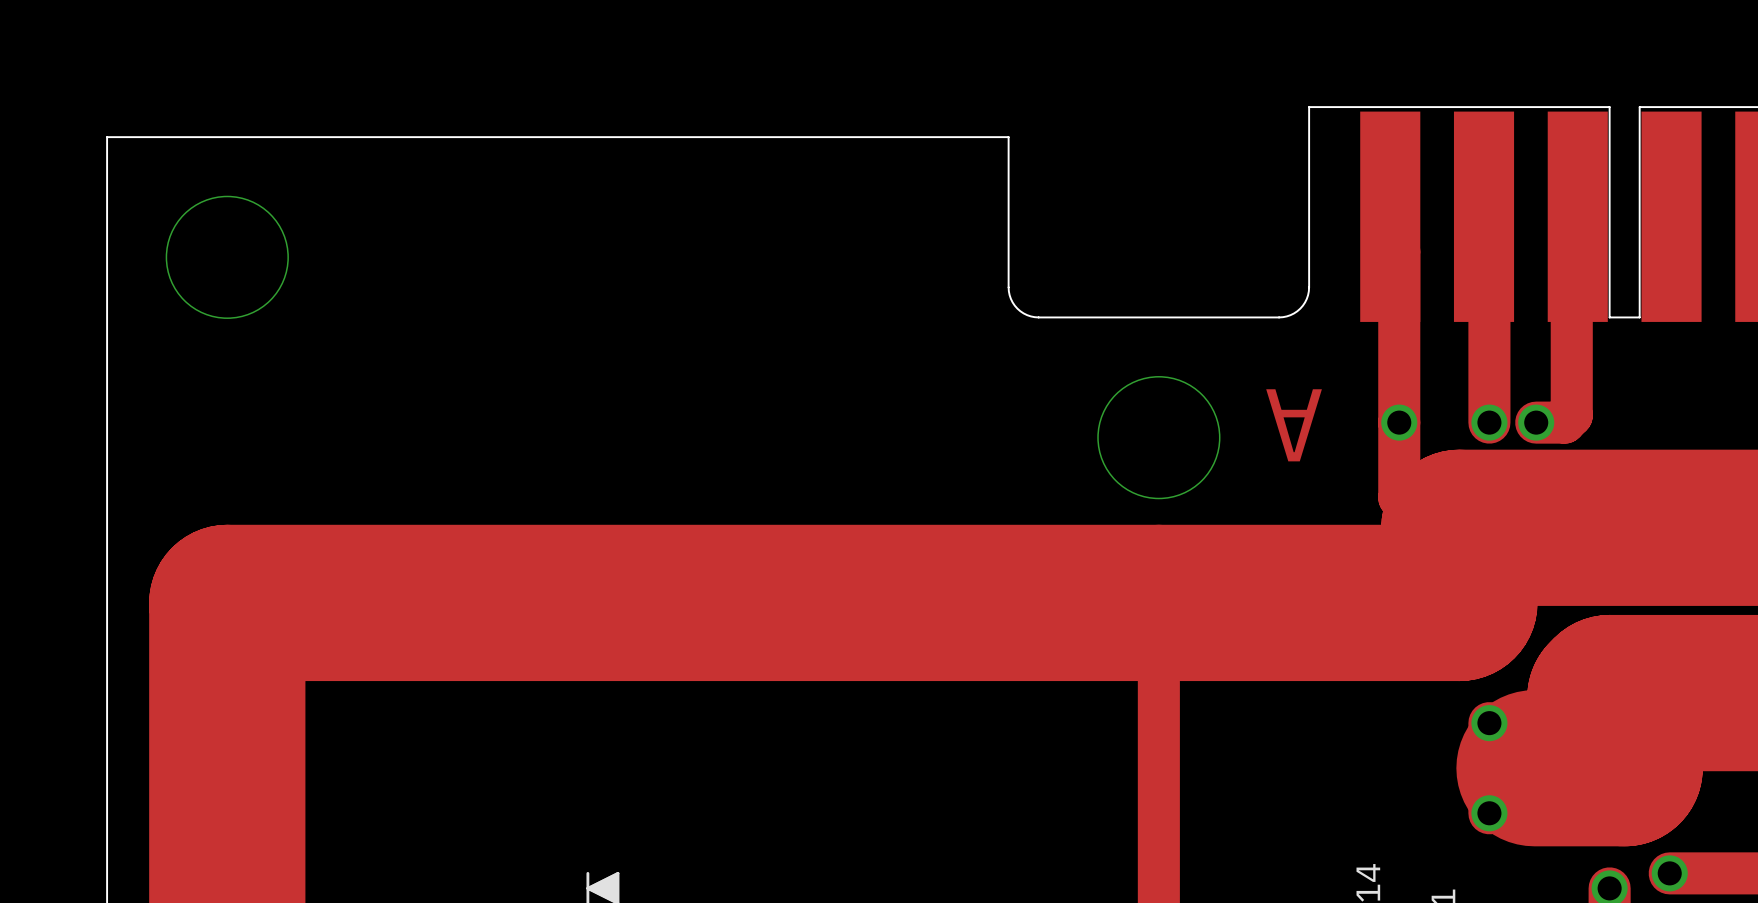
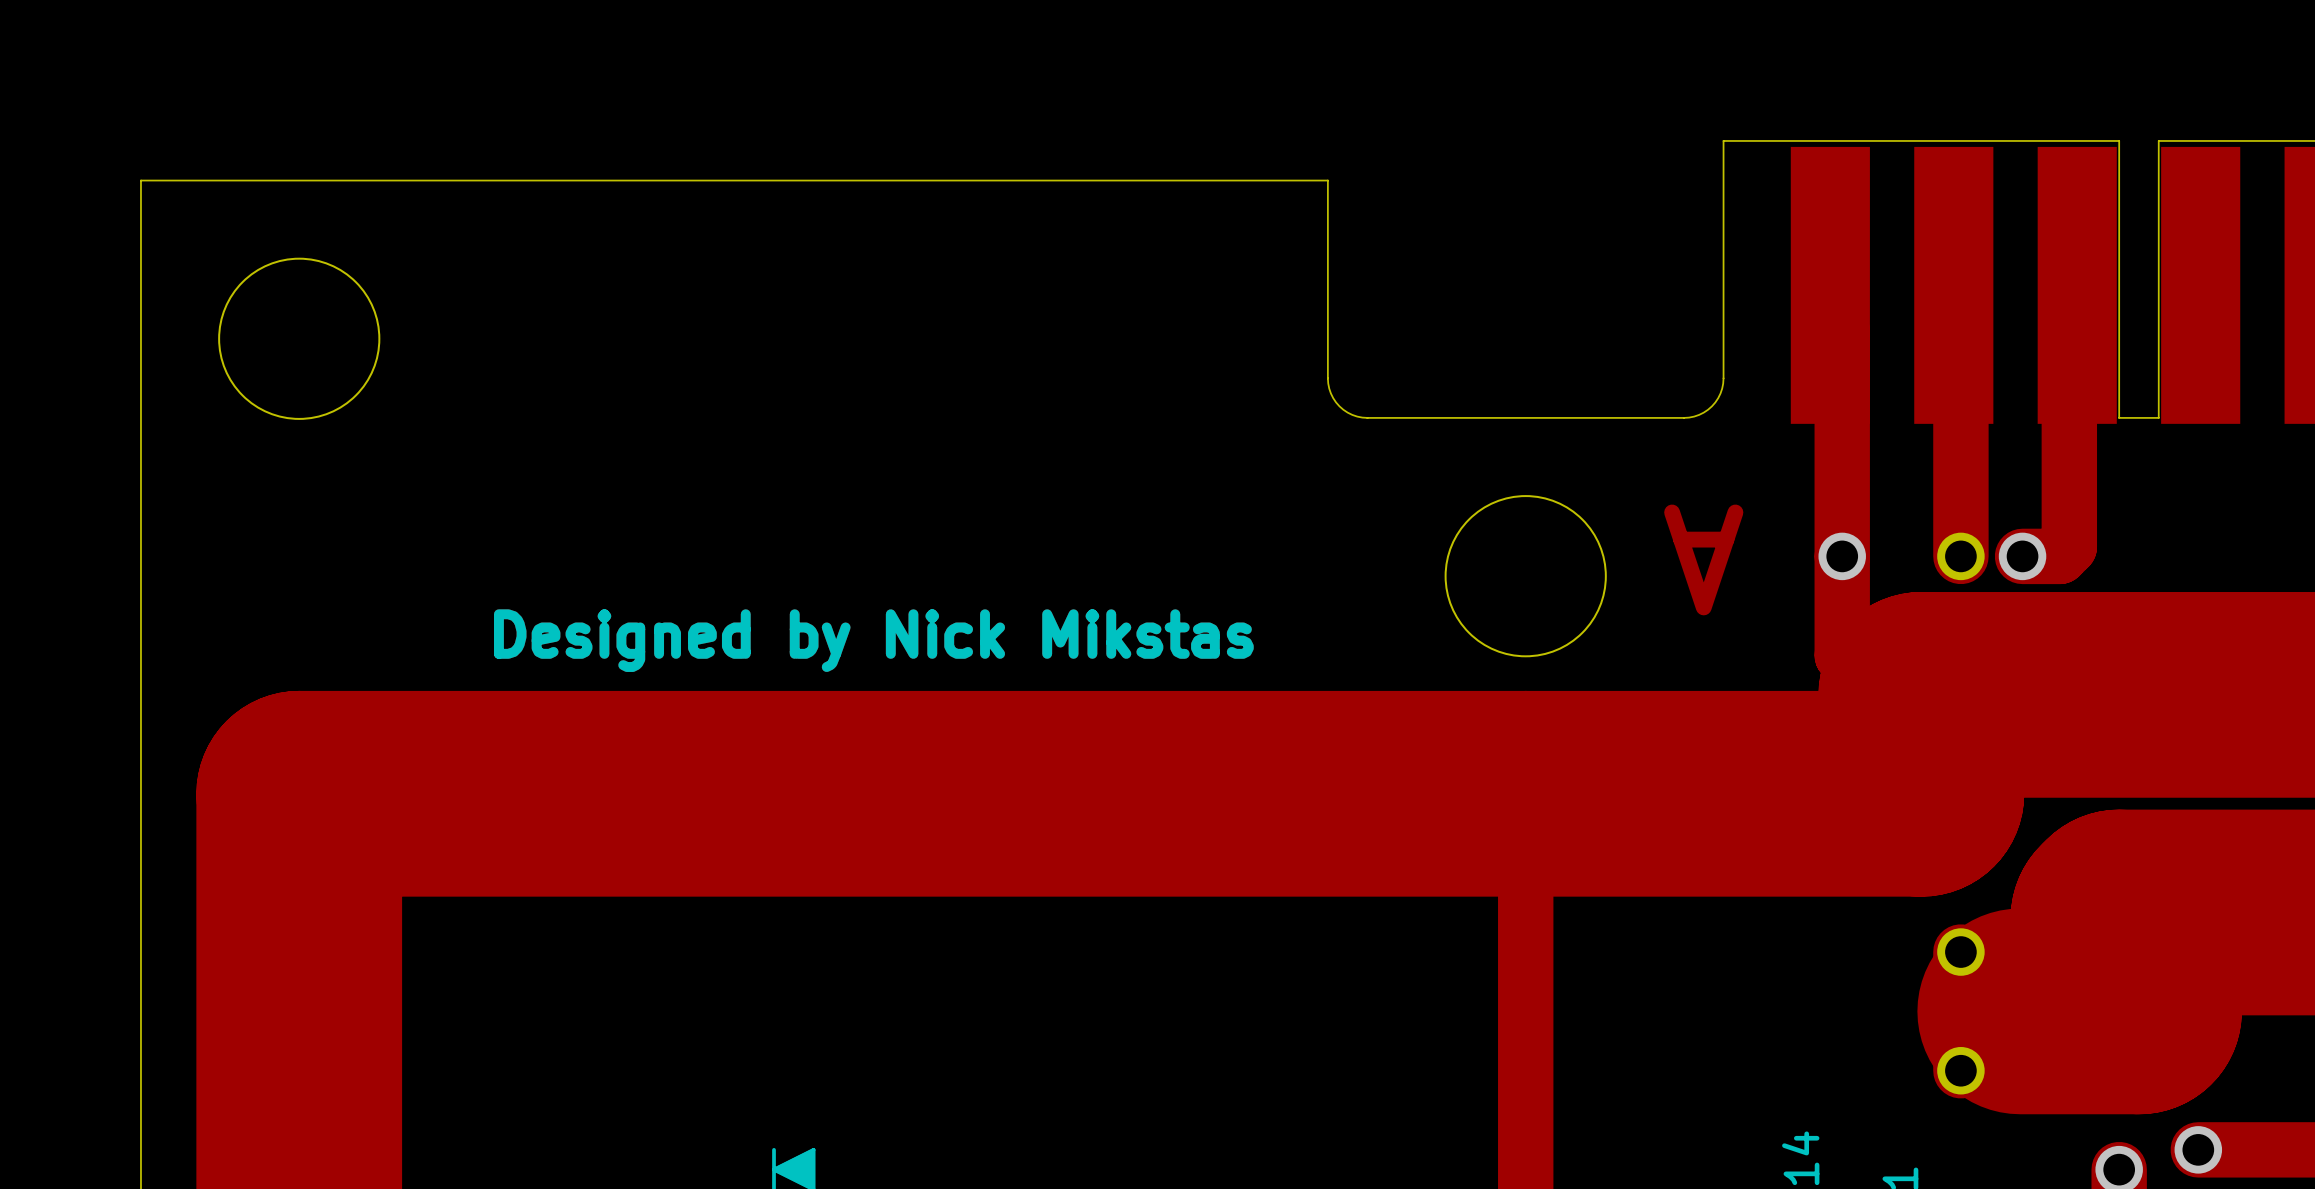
text: none -> Designed by Nick Mikstas (873, 640)

